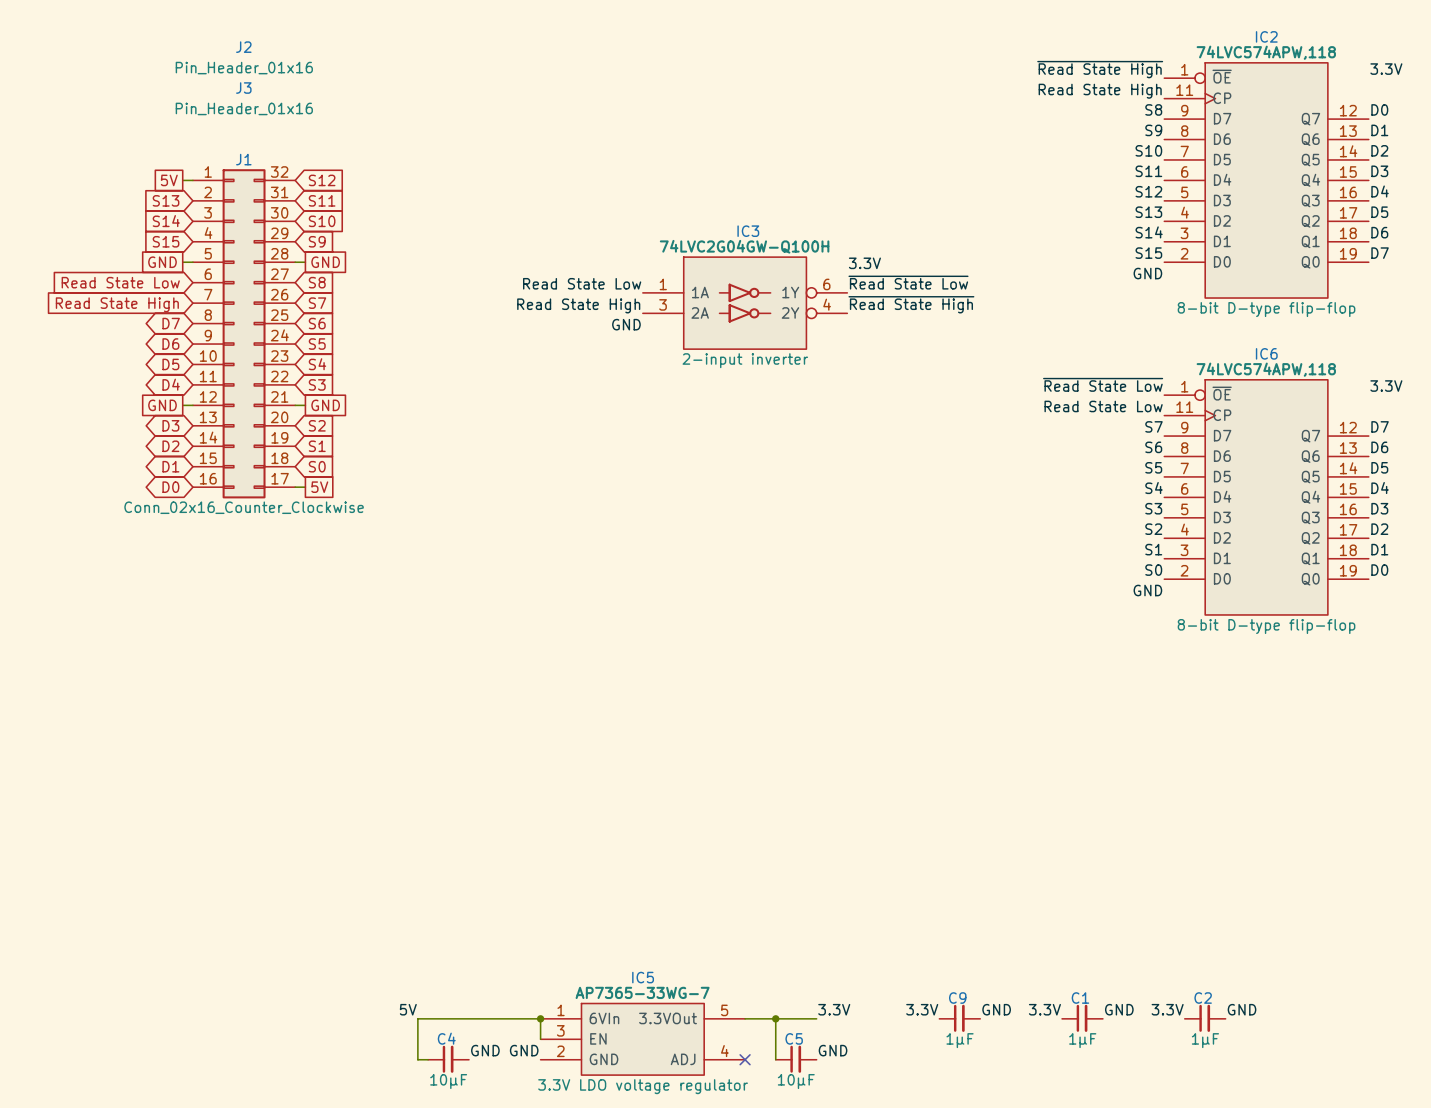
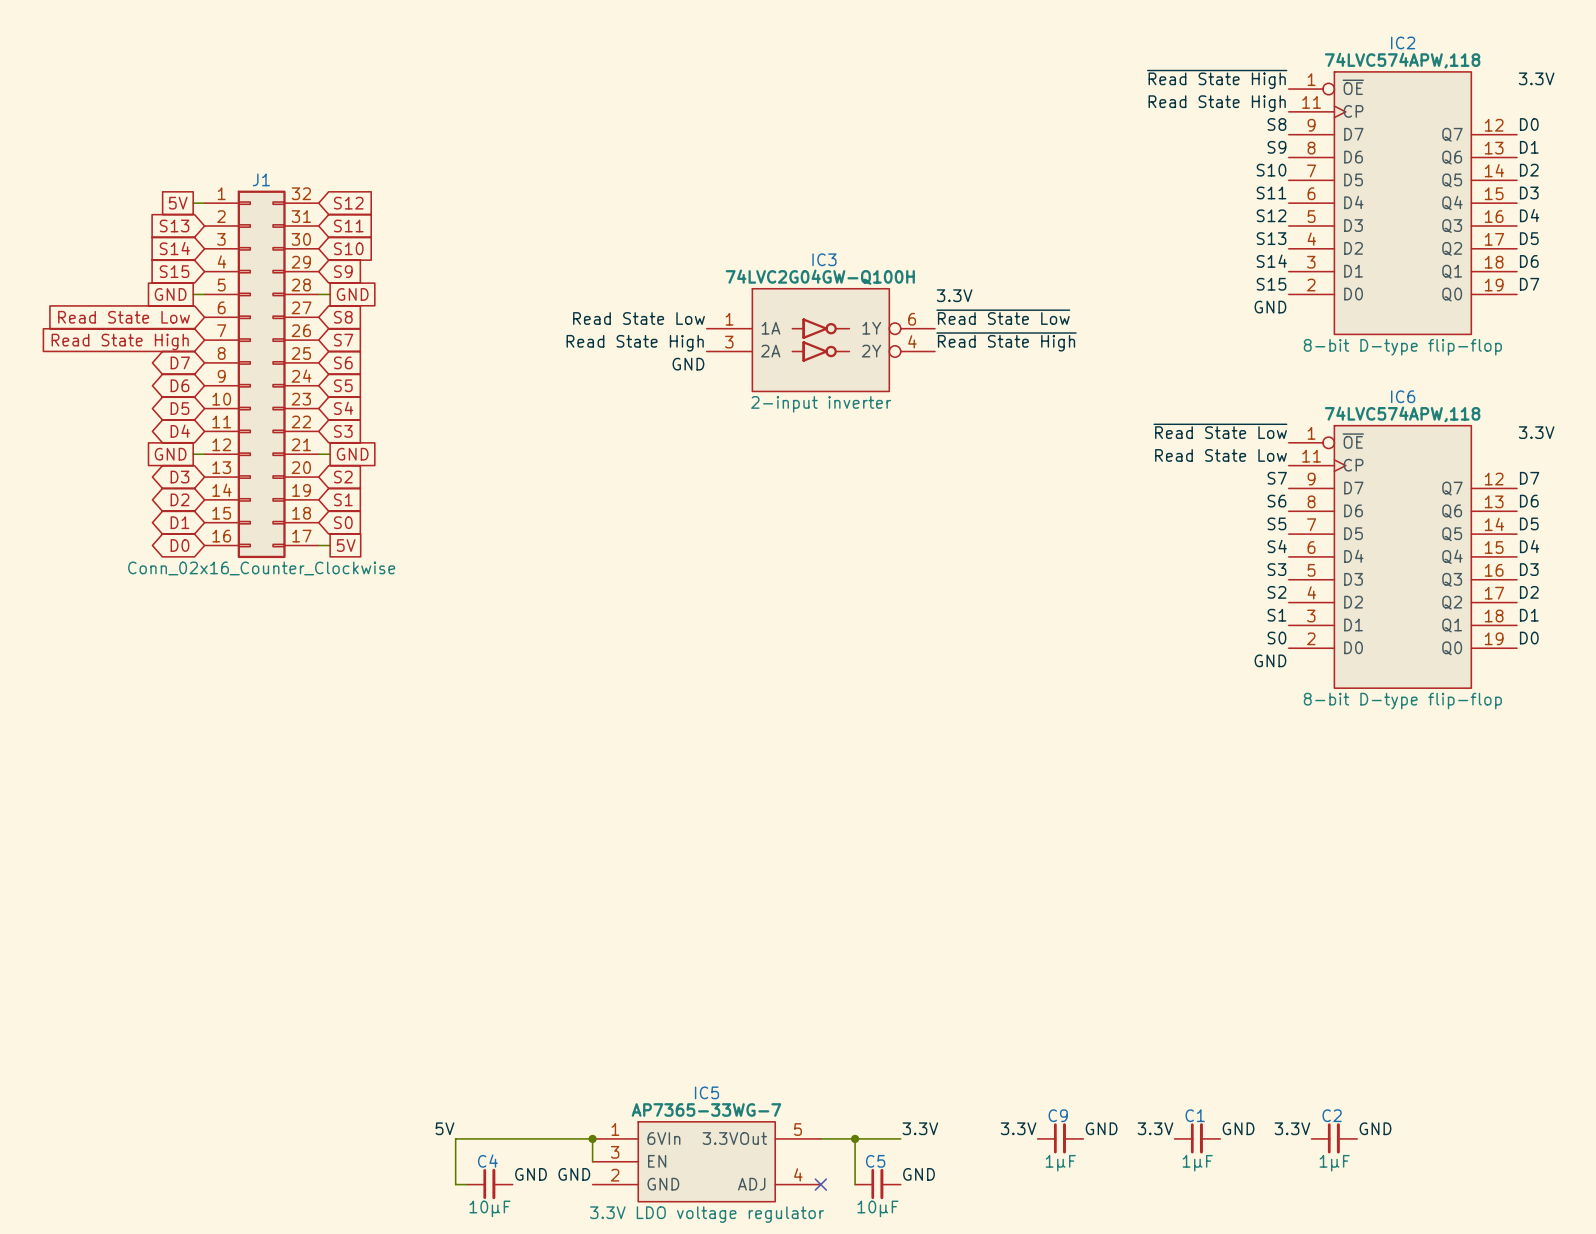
J2: Pin_Header_01x16 (244, 57) -> none
J3: Pin_Header_01x16 (244, 98) -> none

